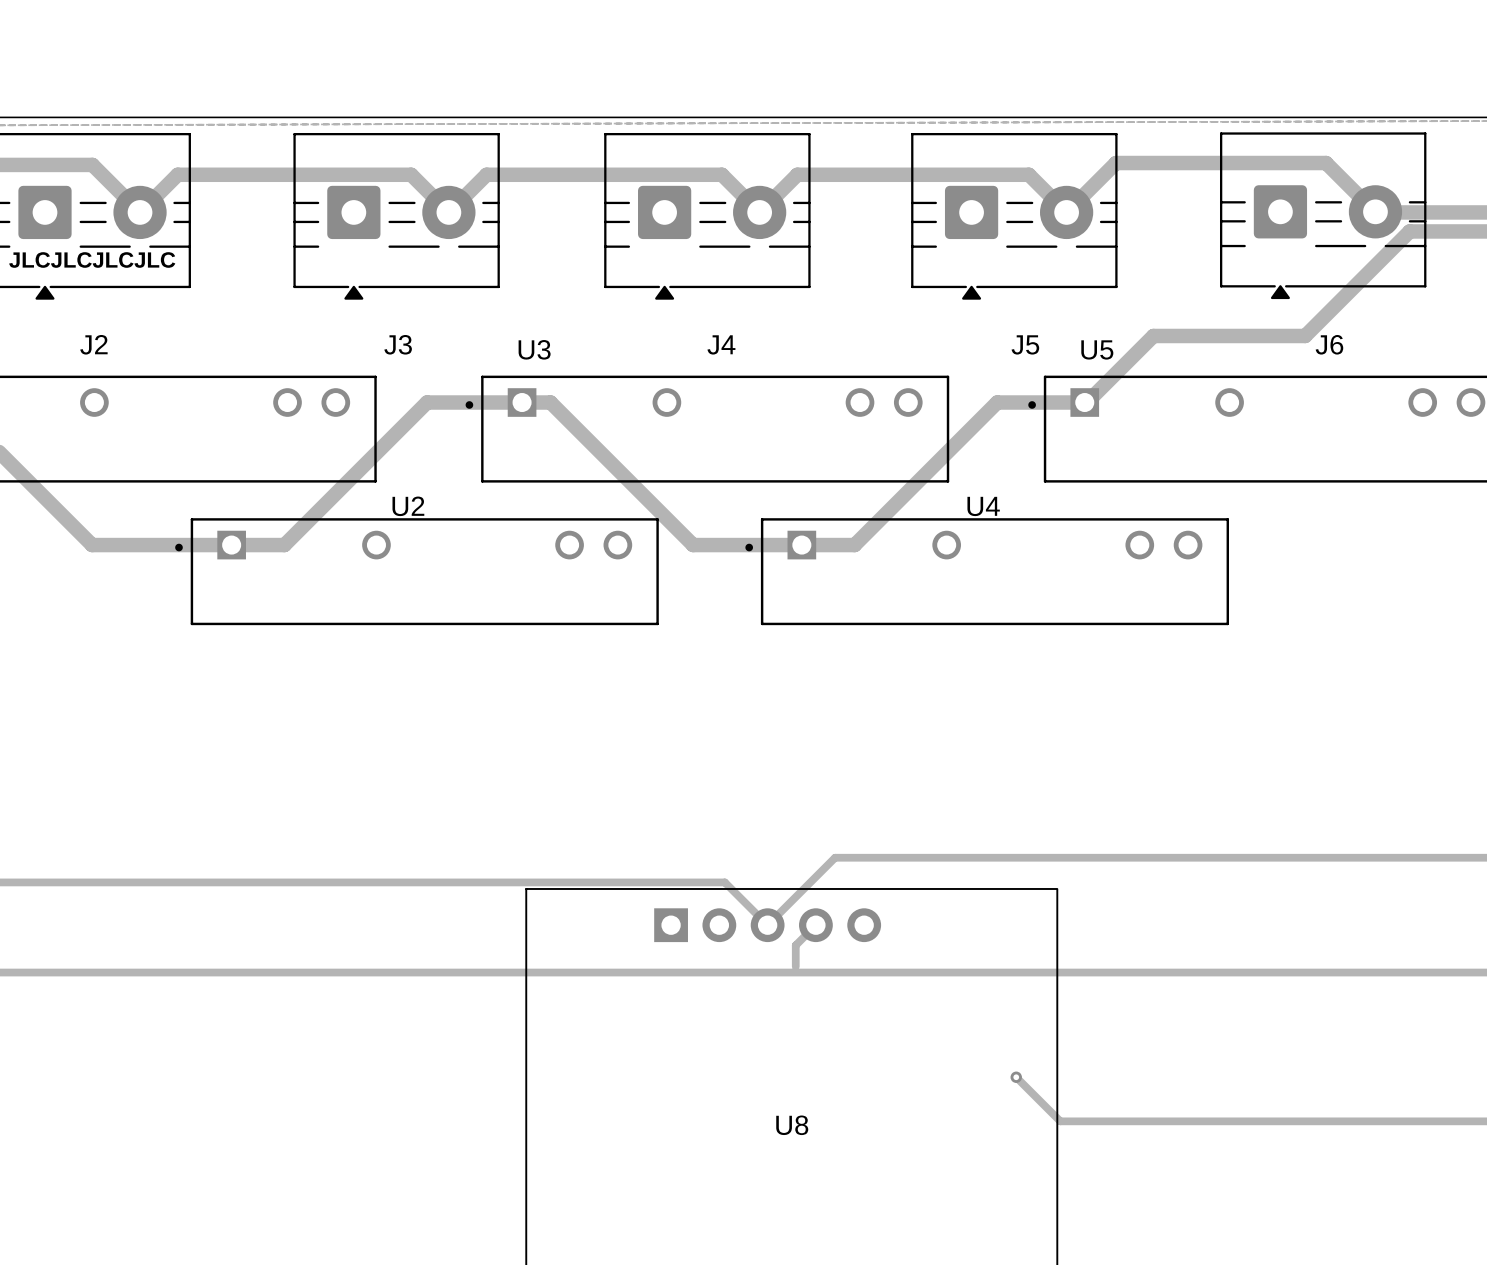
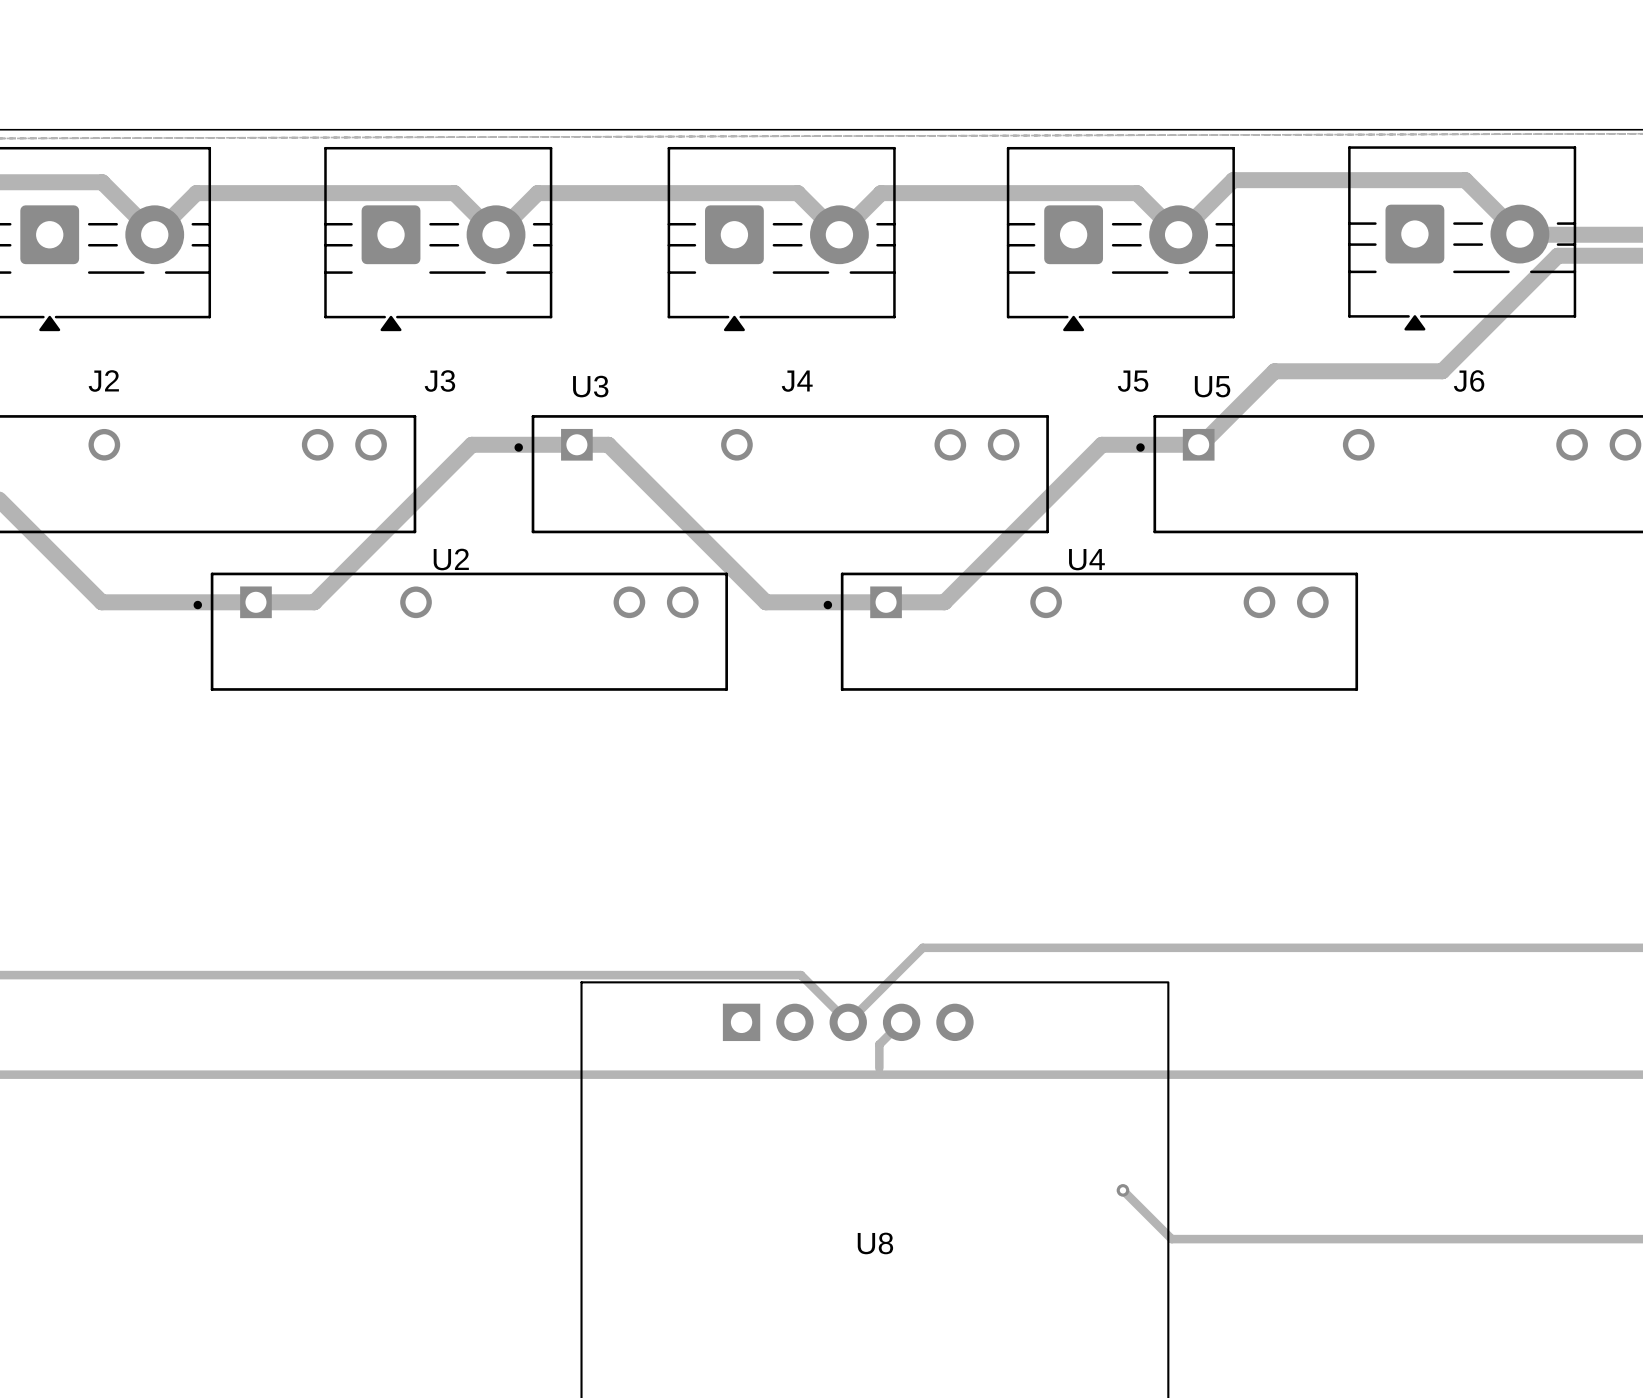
text: JLCJLCJLCJLC (92, 259) -> none

